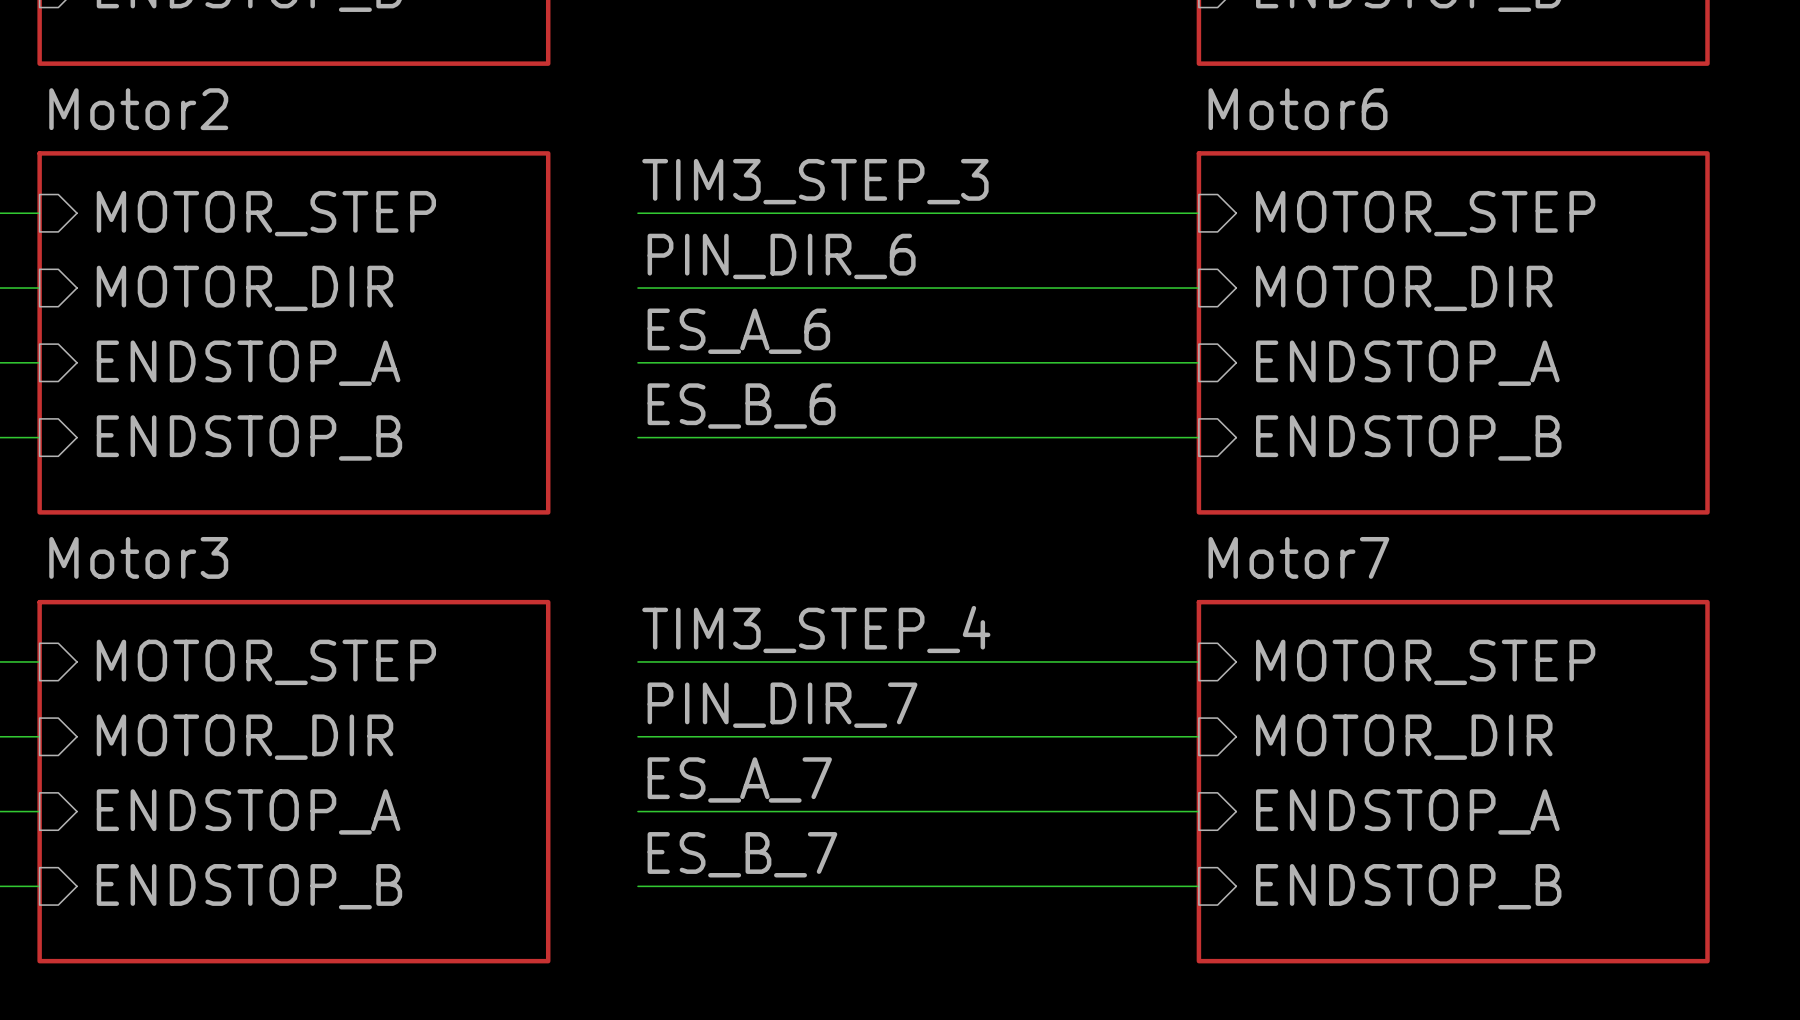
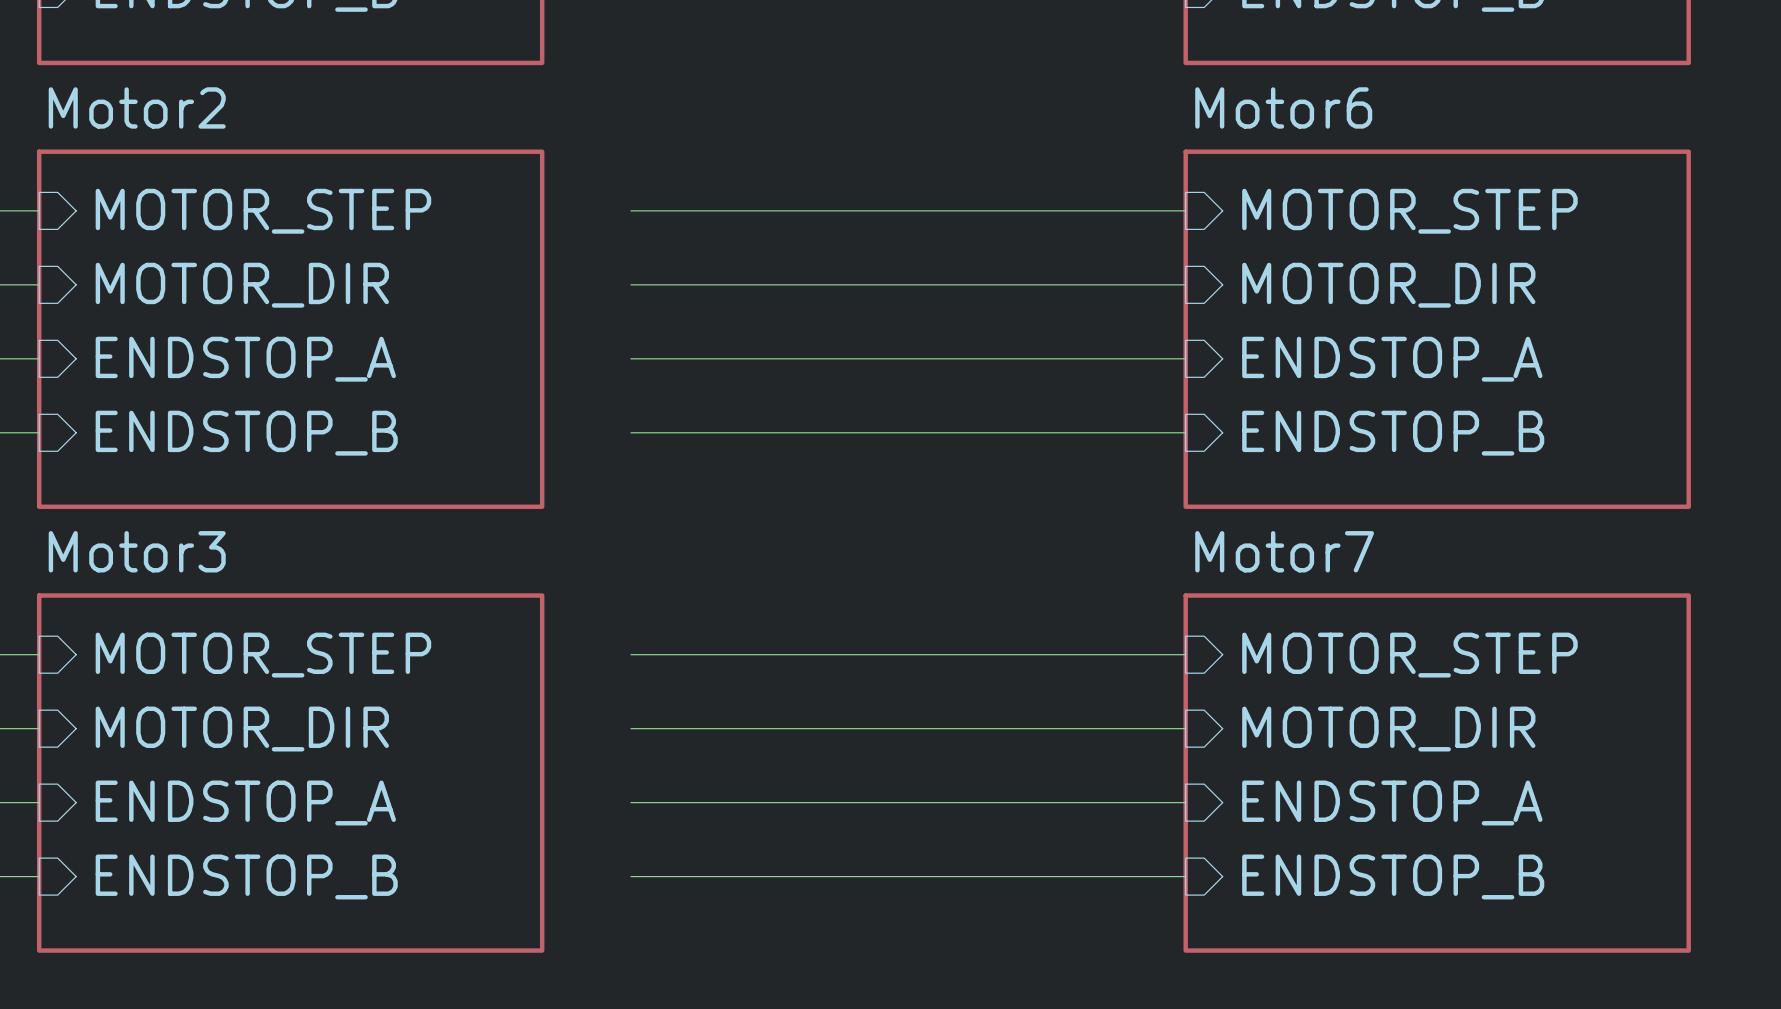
label: TIM3_STEP_3 (815, 181) -> none
label: PIN_DIR_6 (781, 256) -> none
label: ES_A_6 (738, 331) -> none
label: ES_B_6 (741, 406) -> none
label: TIM3_STEP_4 (816, 629) -> none
label: PIN_DIR_7 (782, 705) -> none
label: ES_A_7 (739, 779) -> none
label: ES_B_7 (742, 854) -> none

